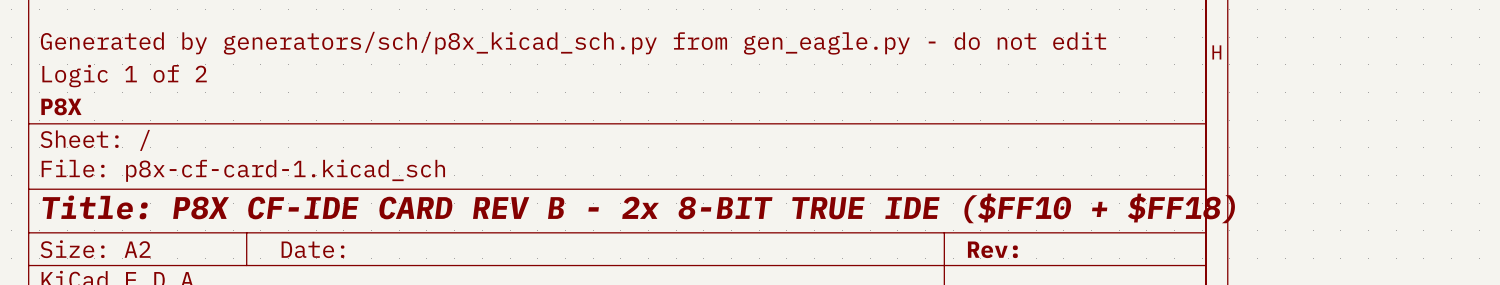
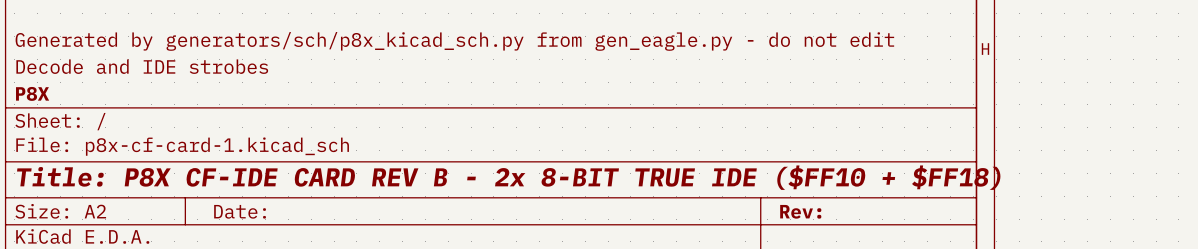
title block: Logic 1 of 2 (124, 76) -> Decode and IDE strobes (142, 66)

